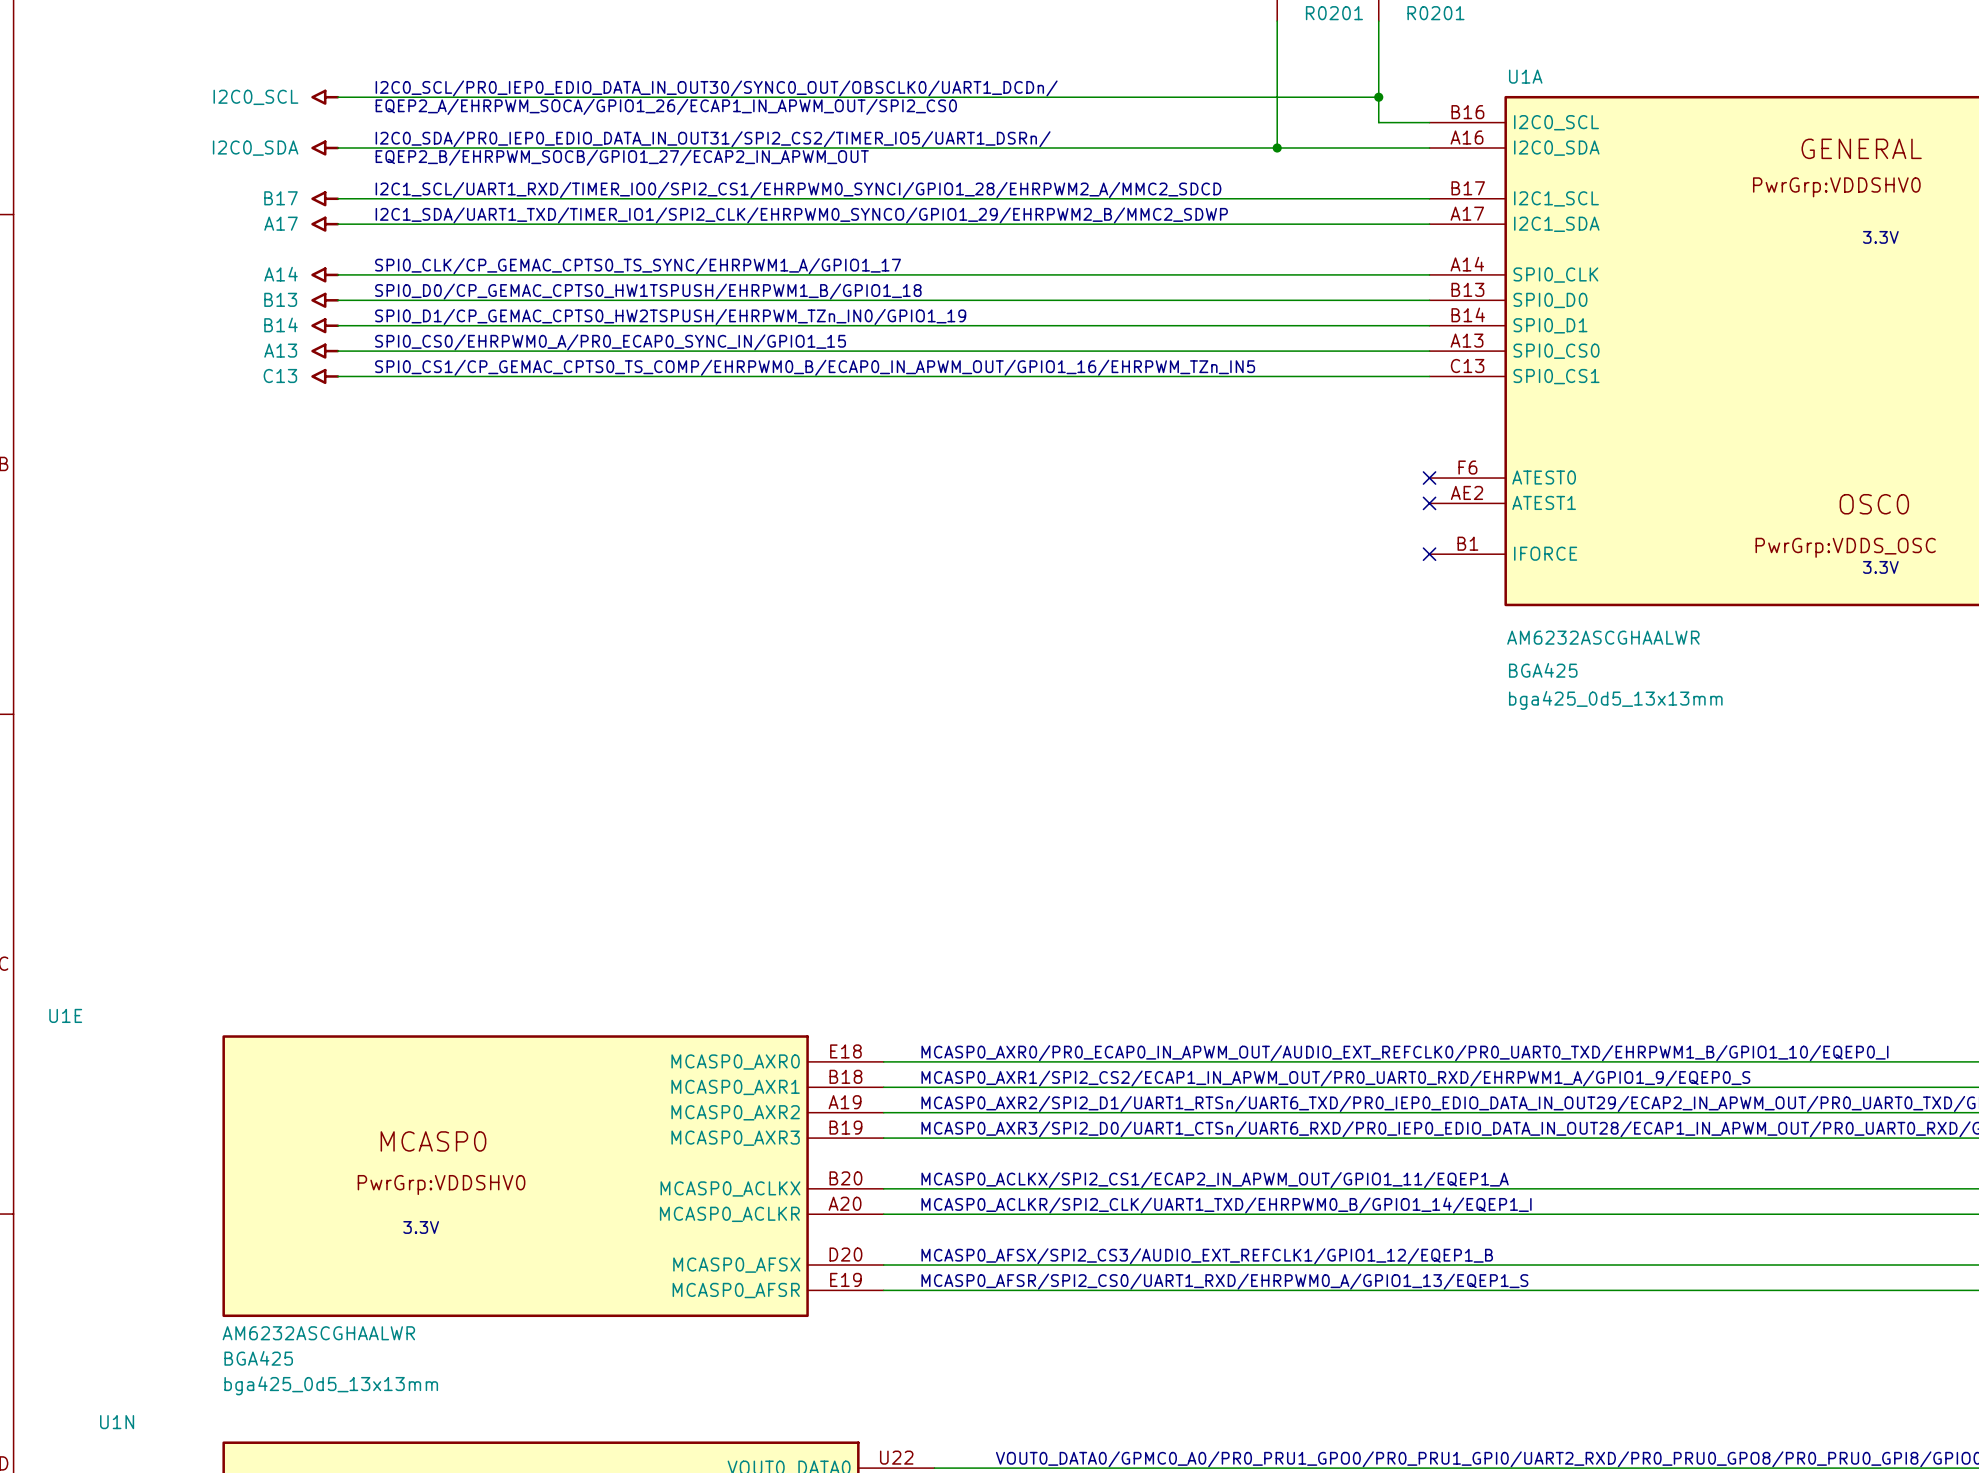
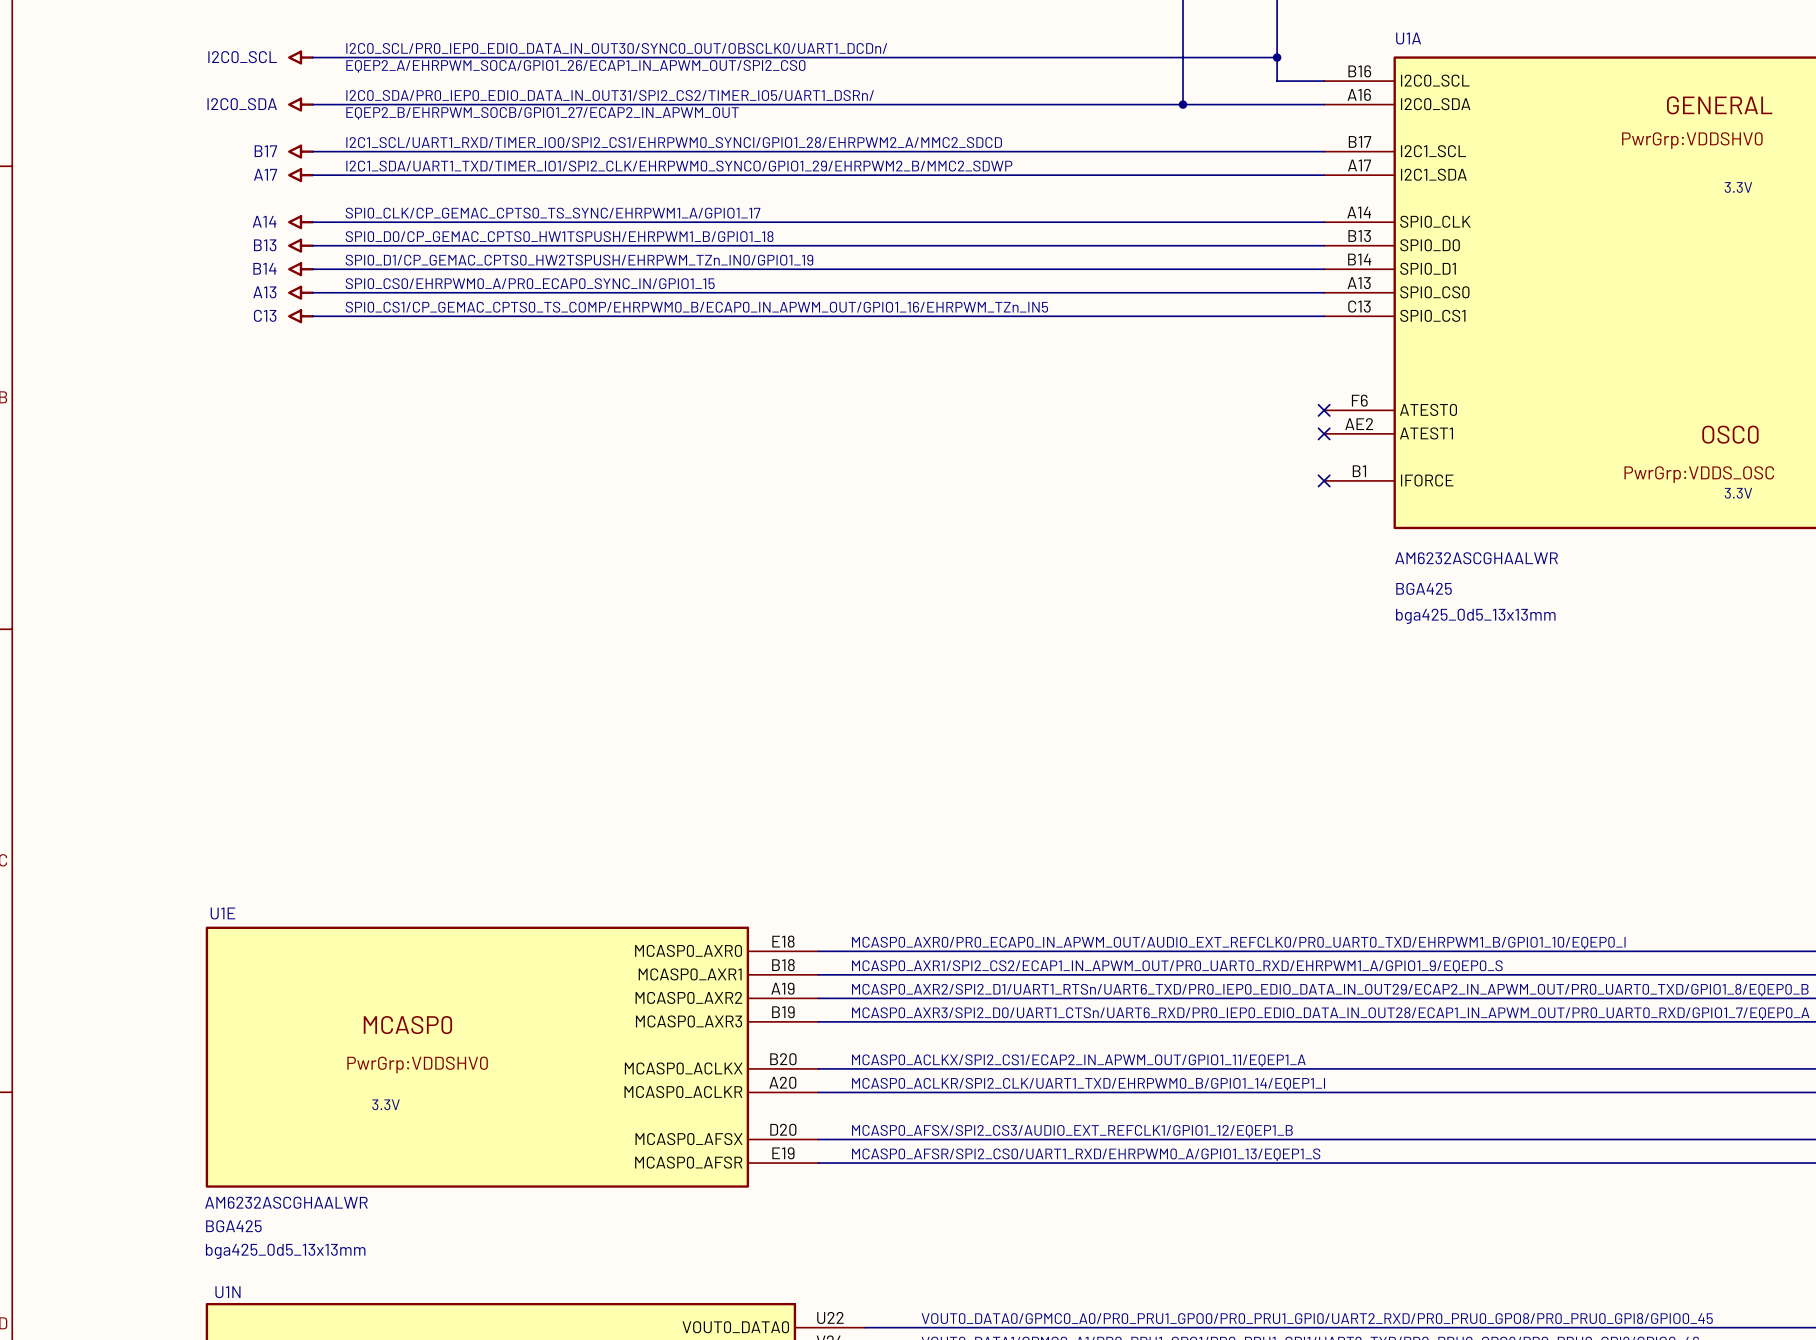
U1E name position: U1E (65, 1015) -> U1E (222, 913)
U1N name position: U1N (117, 1422) -> U1N (227, 1292)

